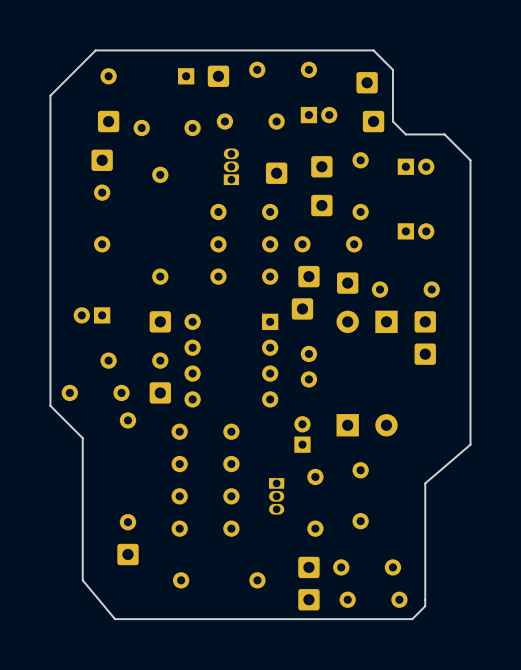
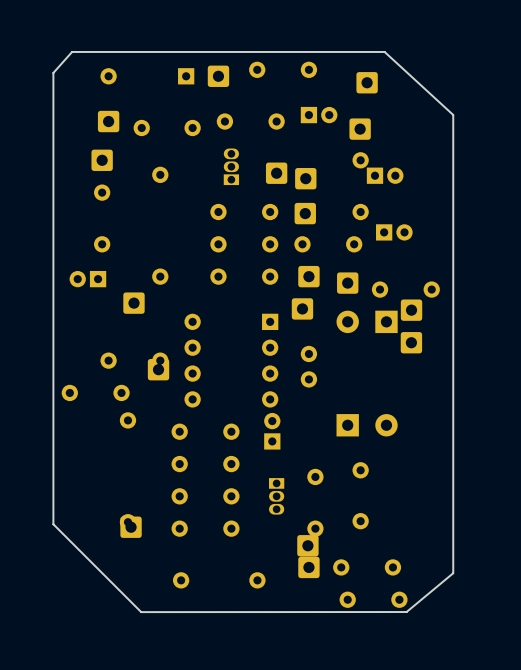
board edge: (373, 50) (392, 69) (392, 121) (405, 134) (444, 134) (470, 160) (470, 444) (425, 483) (425, 606) (412, 619) (115, 619) (82, 580) (82, 438) (50, 405) (50, 95) (95, 50) (373, 50) -> (384, 51) (453, 114) (453, 573) (406, 612) (141, 612) (53, 524) (53, 72) (72, 51) (384, 51)
part position: (373, 121) -> (360, 129)
part: (321, 166) -> none
part: (416, 166) -> none
part: none -> (385, 175)
part: none -> (305, 178)
part: (321, 205) -> none
part: none -> (305, 213)
part position: (416, 231) -> (394, 232)
part: none -> (133, 303)
part: none -> (411, 310)
part position: (91, 315) -> (87, 279)
part: (160, 321) -> none
part: (425, 321) -> none
part: none -> (411, 342)
part: (425, 354) -> none
part position: (160, 392) -> (158, 369)
part position: (302, 434) -> (272, 431)
part position: (127, 554) -> (131, 527)
part position: (308, 599) -> (307, 545)

